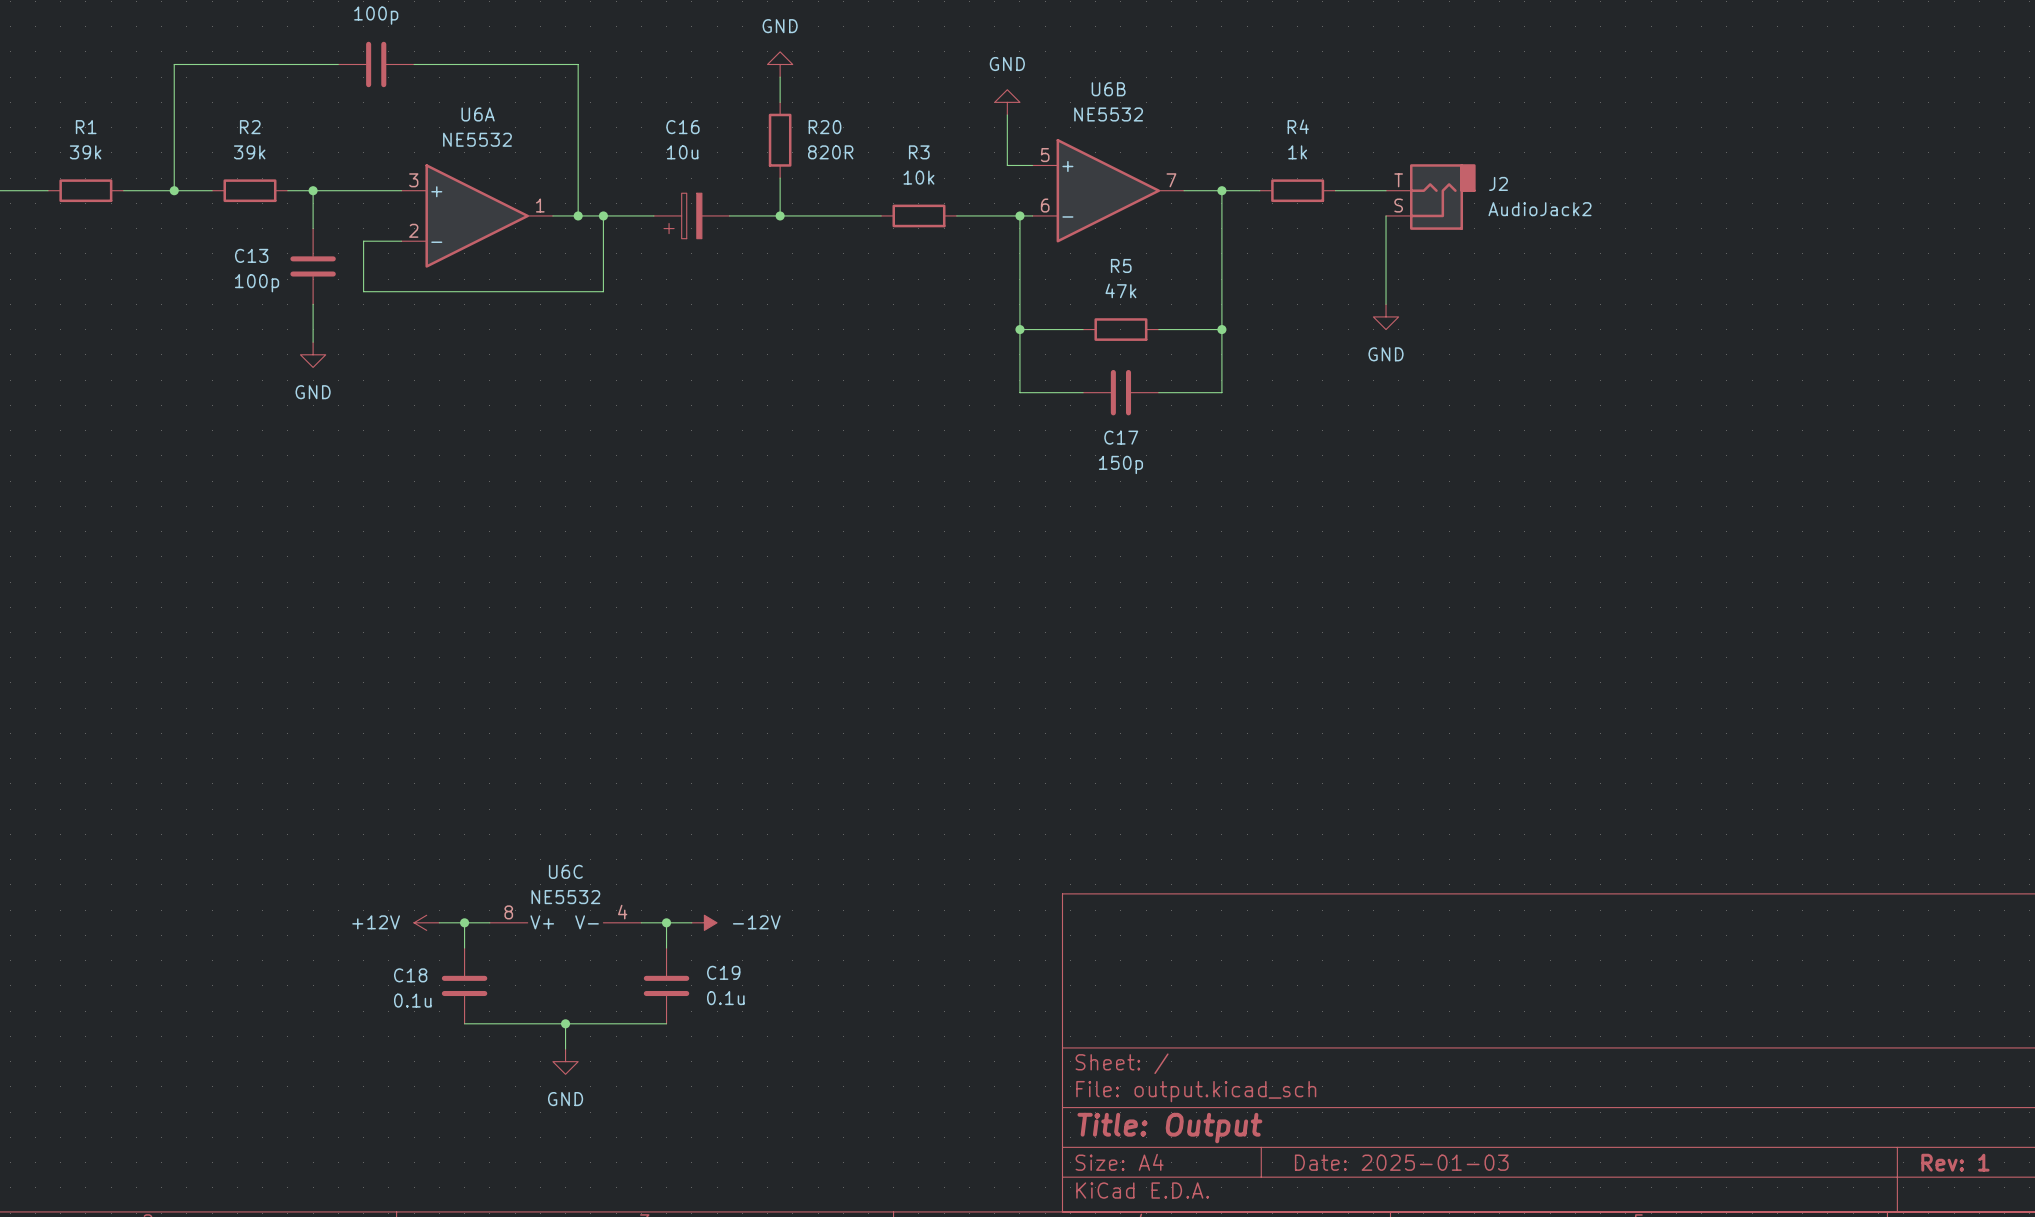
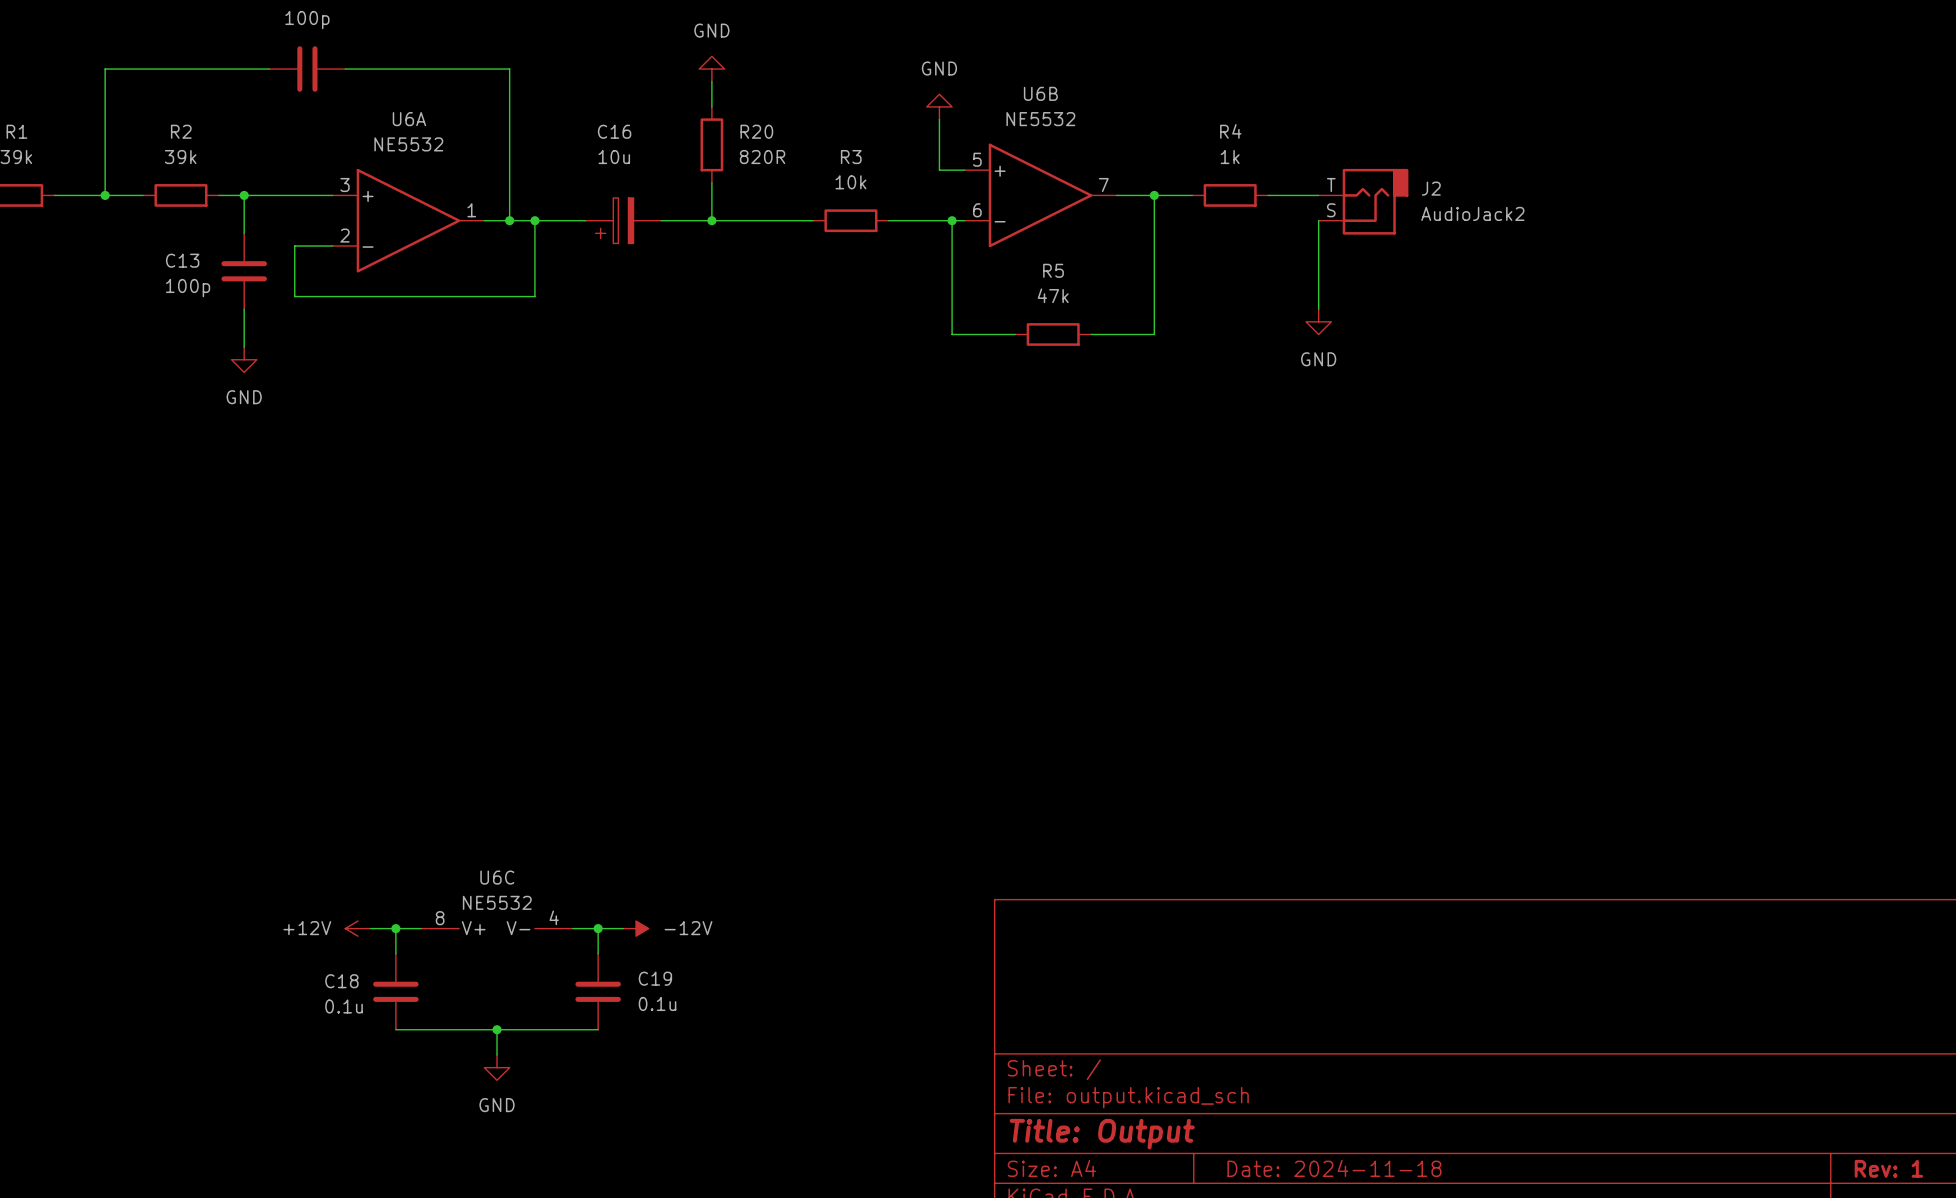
wire: (1019, 329) (1019, 392) (1083, 392) -> none
junction: (1019, 329) -> none
wire: (1221, 329) (1221, 392) (1158, 392) -> none
junction: (1221, 329) -> none
C17: 150p (1120, 392) -> none
title block: Date: 2025-01-03 (1401, 1162) -> Date: 2024-11-18 (1334, 1168)

